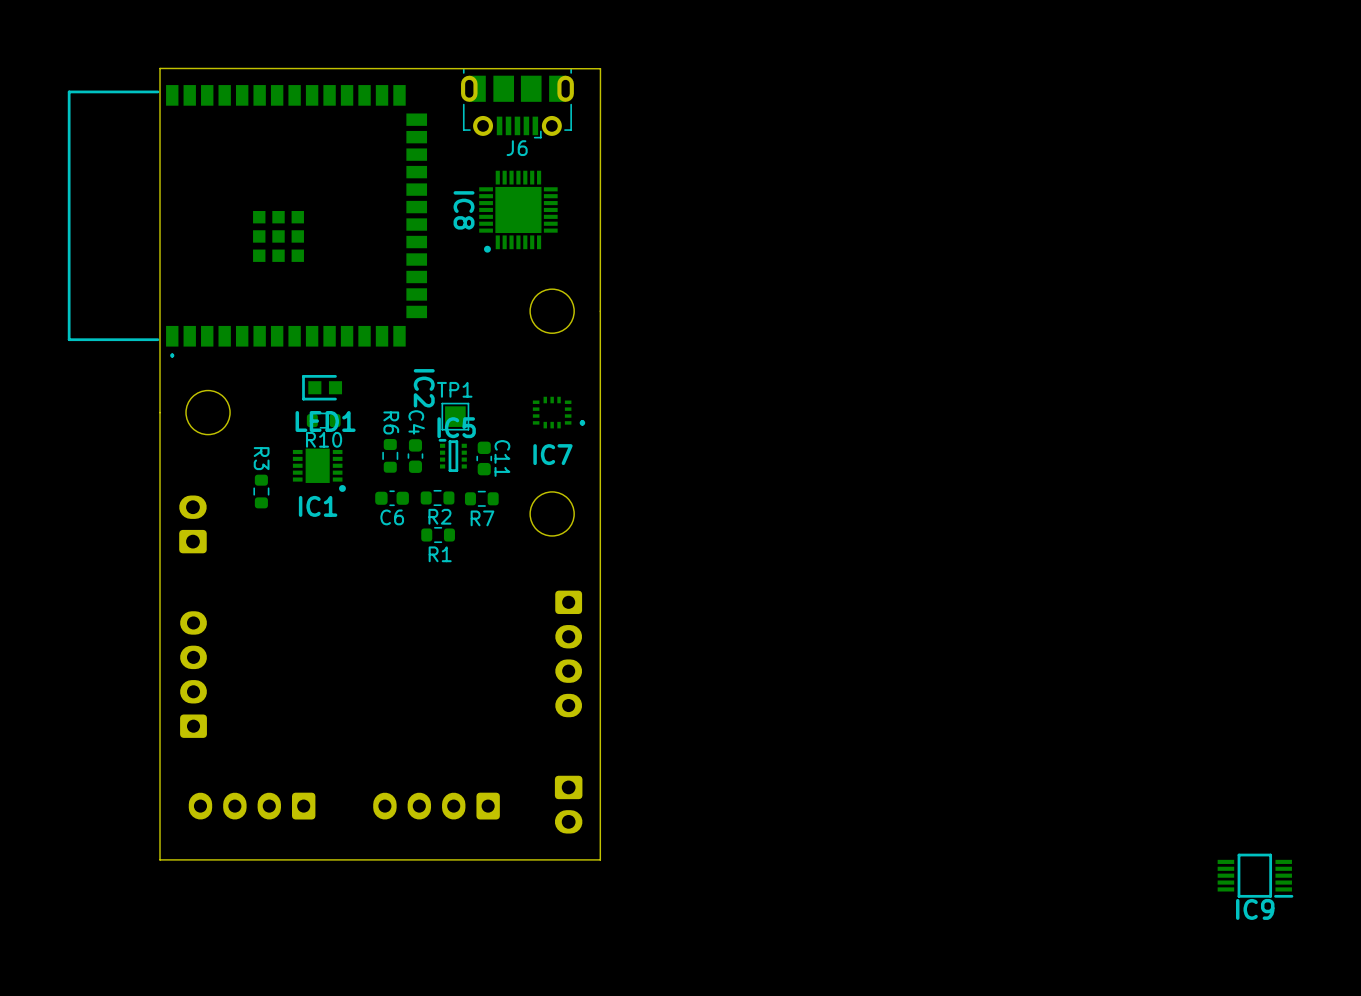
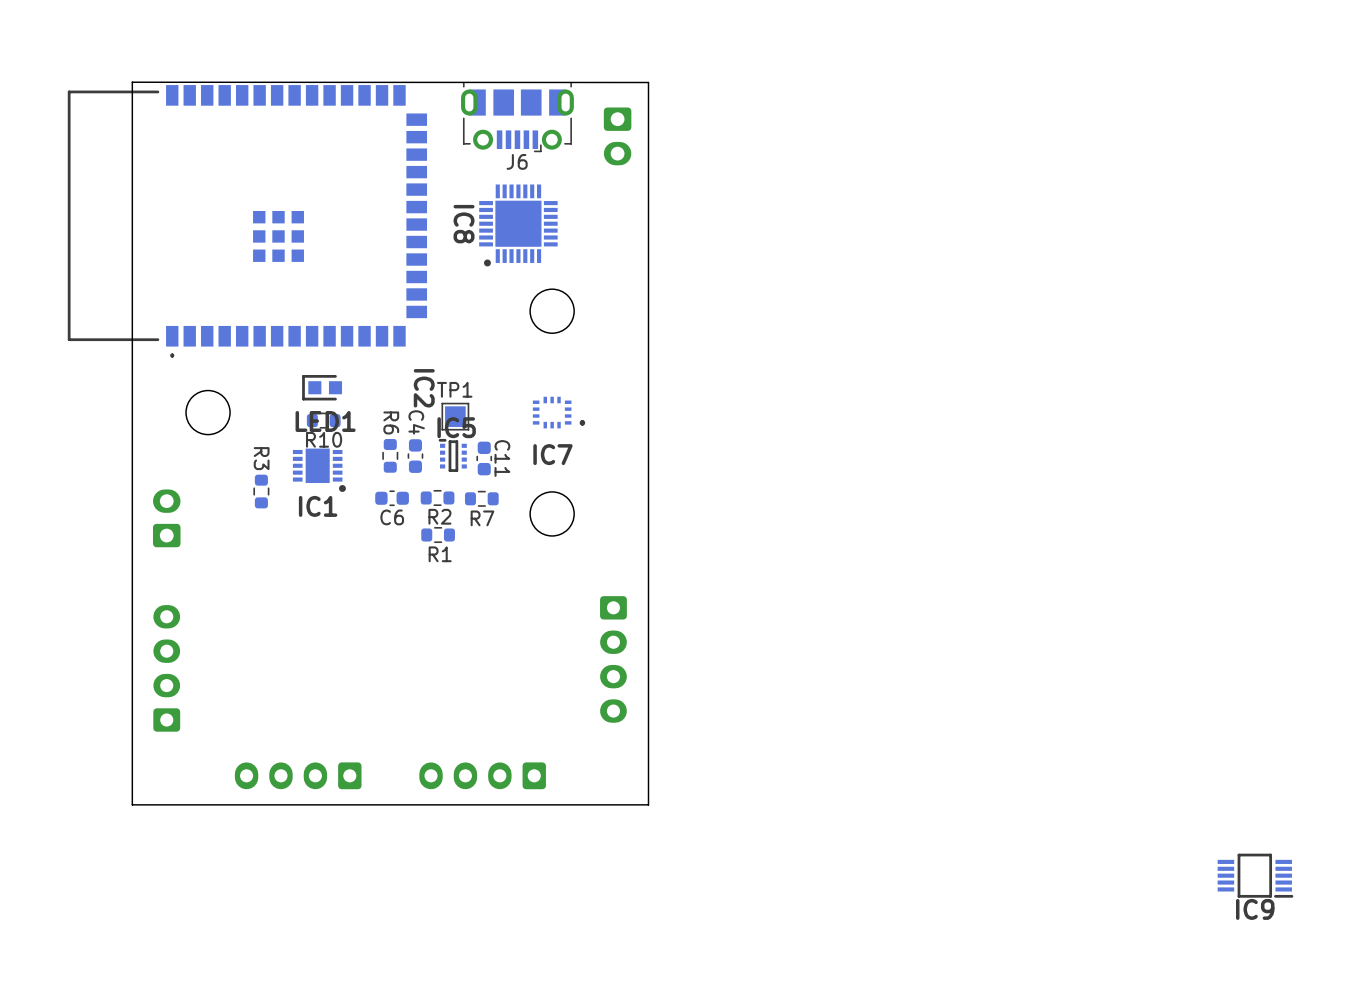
board edge: (160, 68) (160, 859) (600, 859) (600, 68) (160, 68) -> (132, 82) (648, 82) (648, 804) (132, 804) (132, 82)
J6 position: (517, 103) -> (517, 117)
part: none -> (617, 136)
IC8 position: (518, 211) -> (518, 225)
part position: (192, 524) -> (166, 518)
part position: (568, 653) -> (613, 659)
part position: (193, 674) -> (166, 668)
part: (568, 804) -> none
part position: (252, 806) -> (298, 775)
part position: (436, 806) -> (482, 775)

